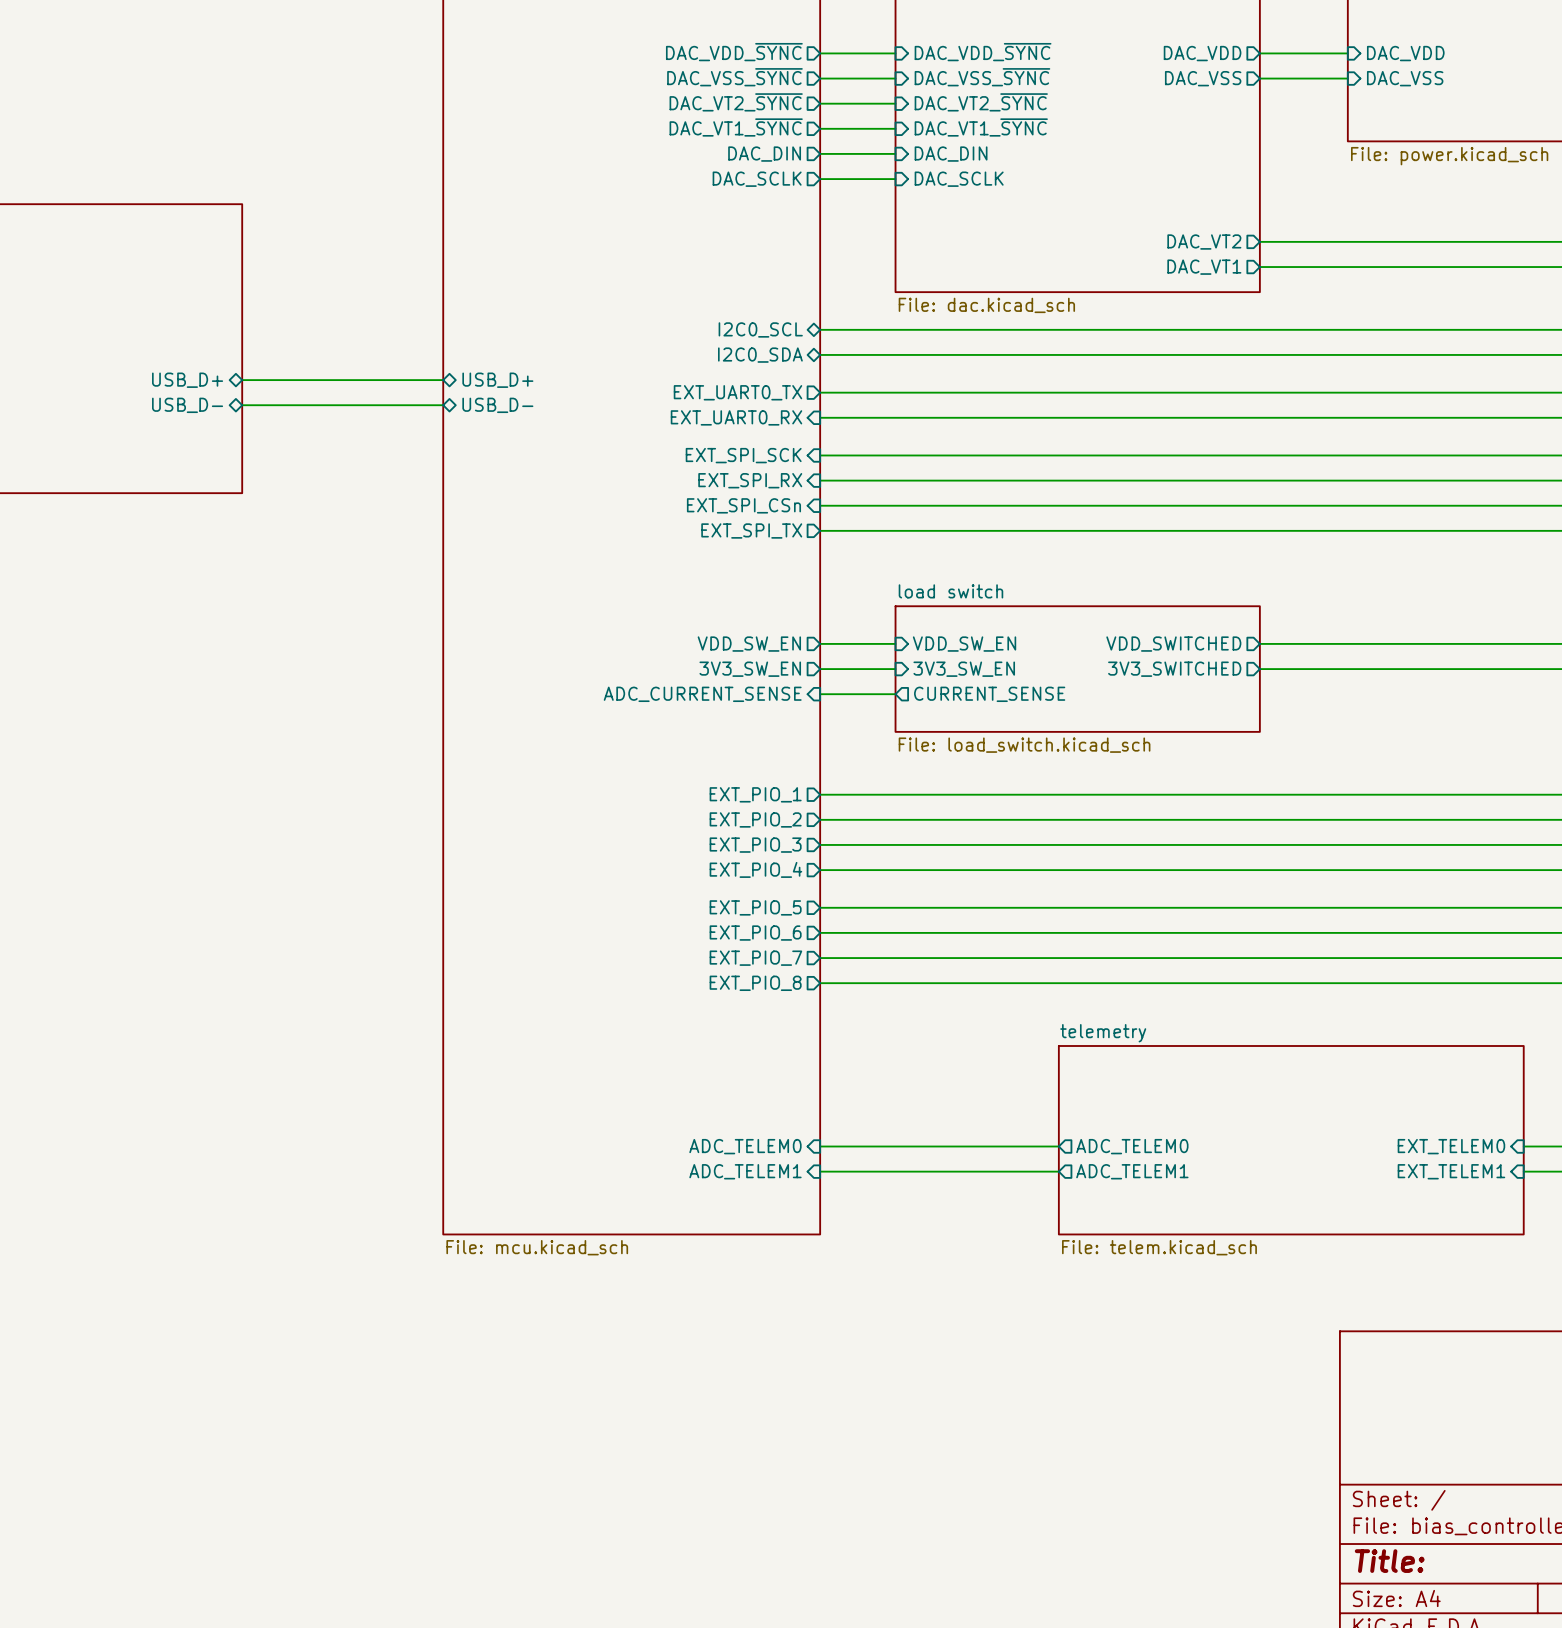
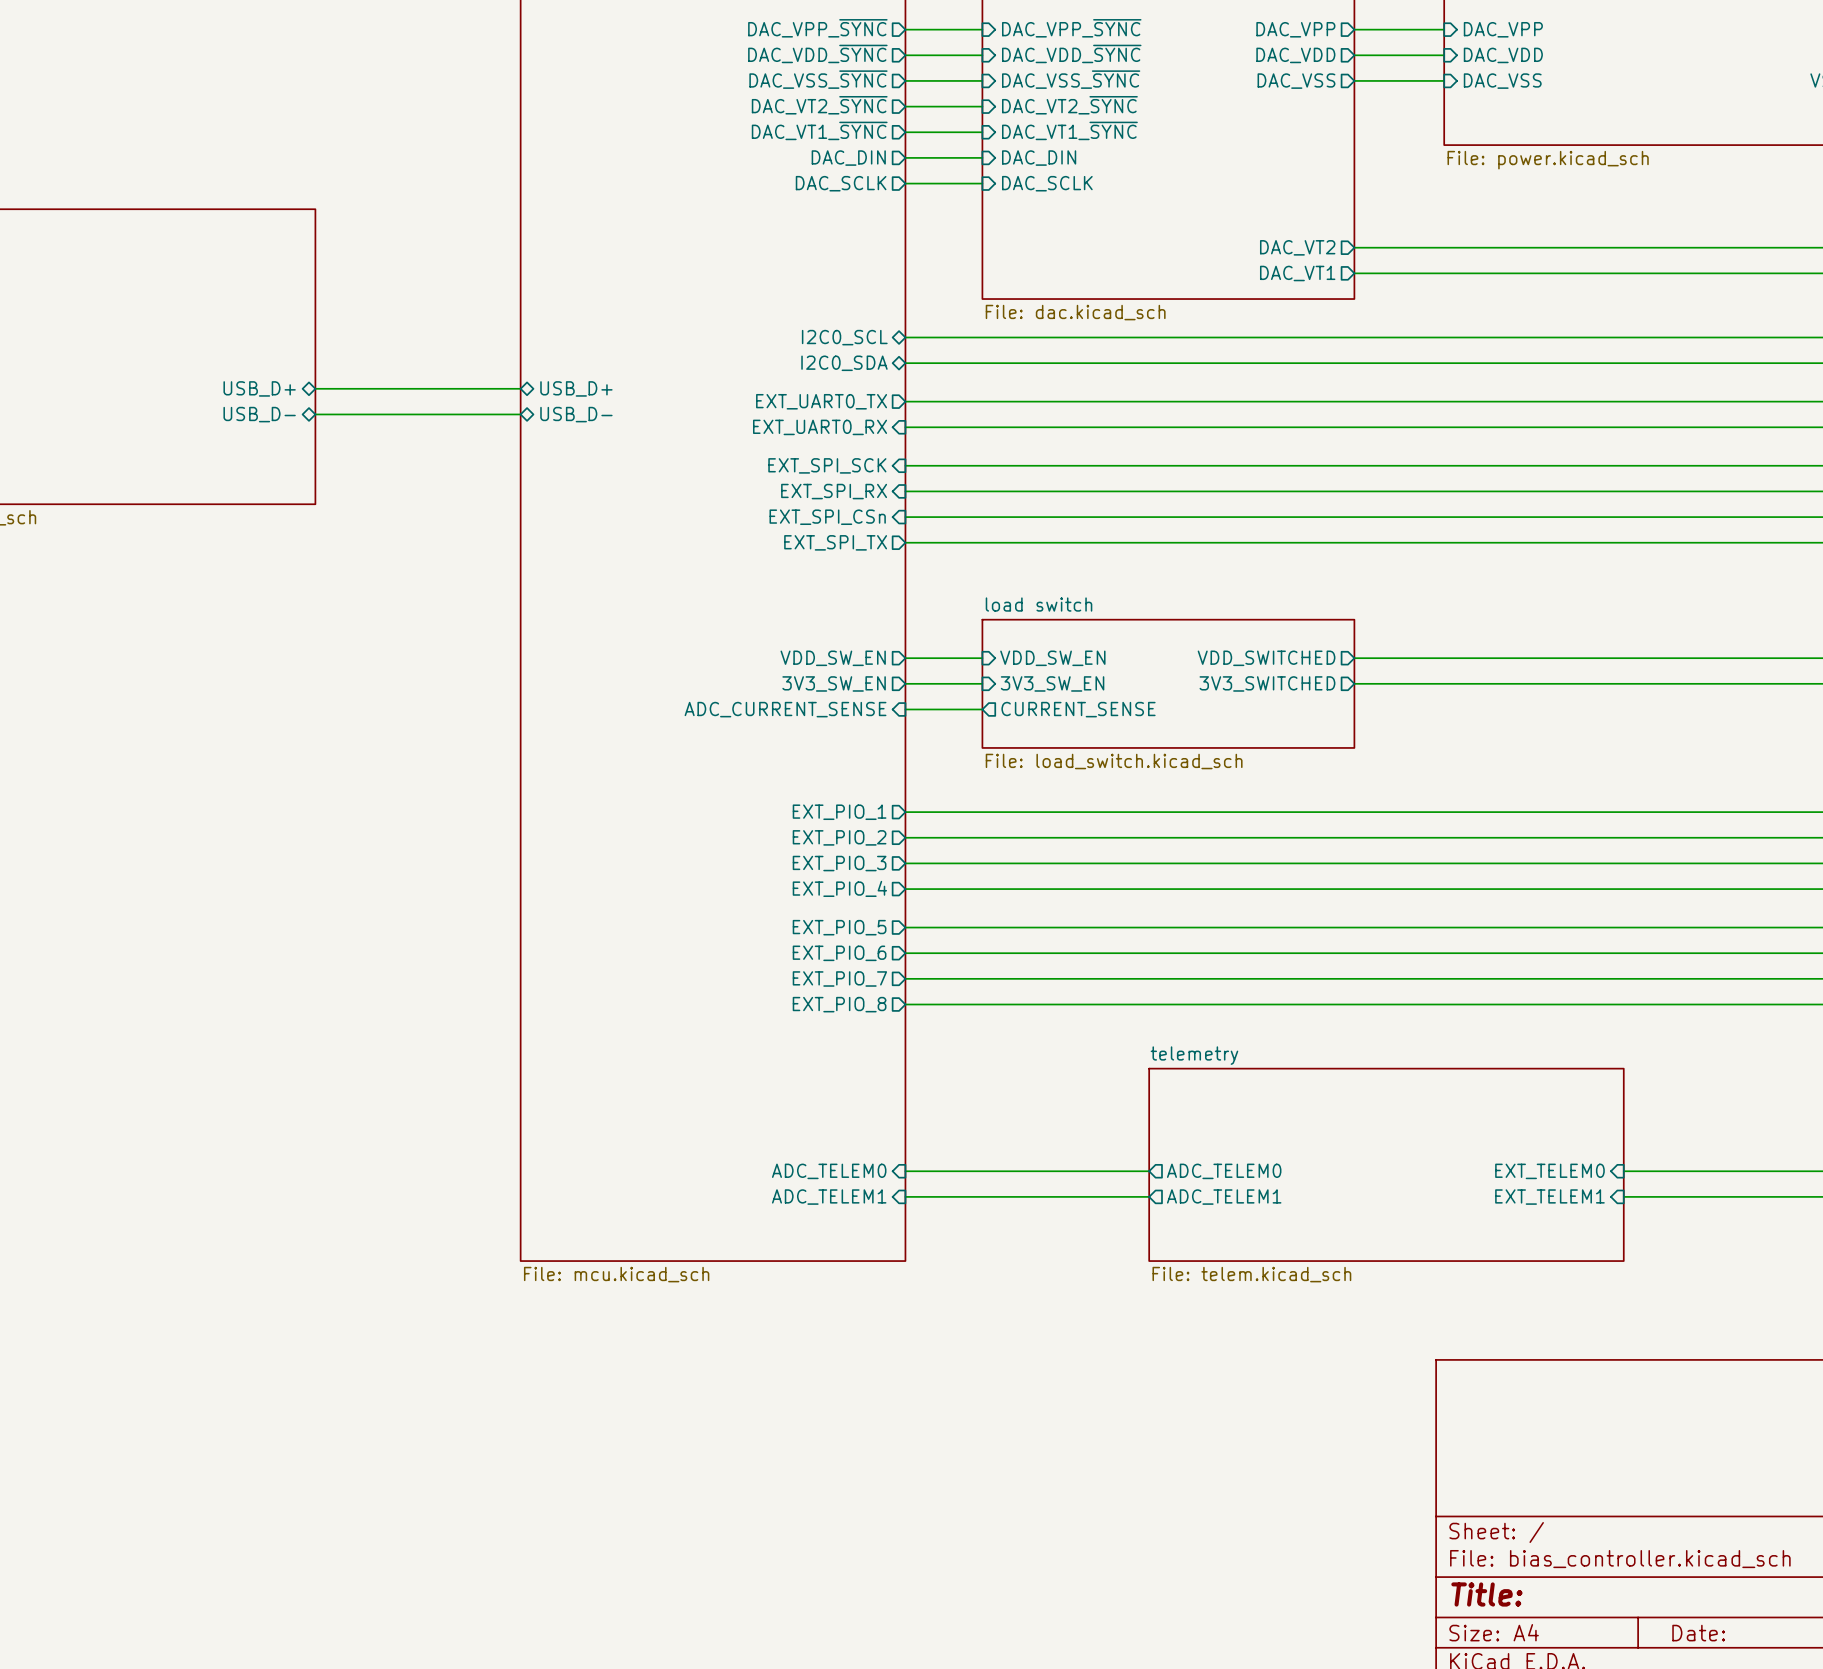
sheet pin: none -> DAC_VPP_~{SYNC} (817, 28)
sheet pin: none -> DAC_VPP_~{SYNC} (1071, 28)
wire: none -> (905, 29) (982, 29)
sheet pin: none -> DAC_VPP (1295, 29)
wire: none -> (1354, 29) (1444, 29)
sheet pin: none -> DAC_VPP (1503, 29)

